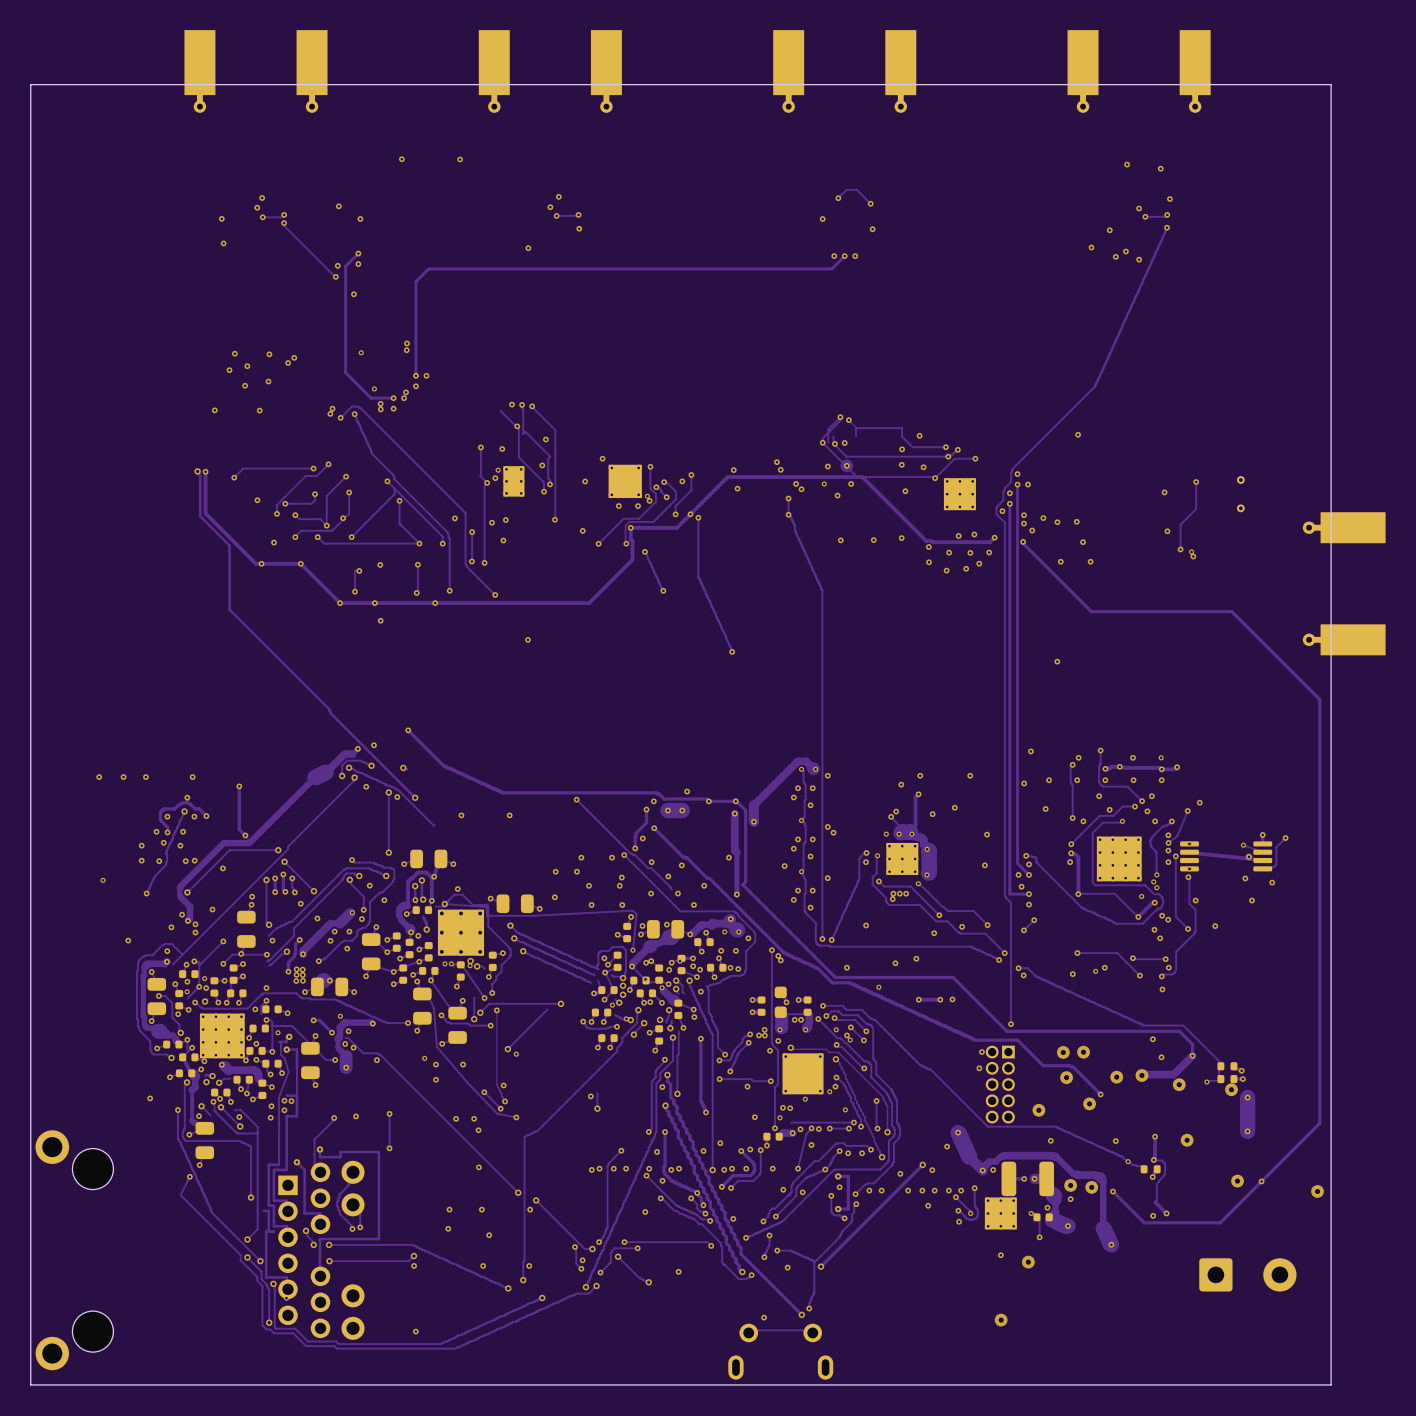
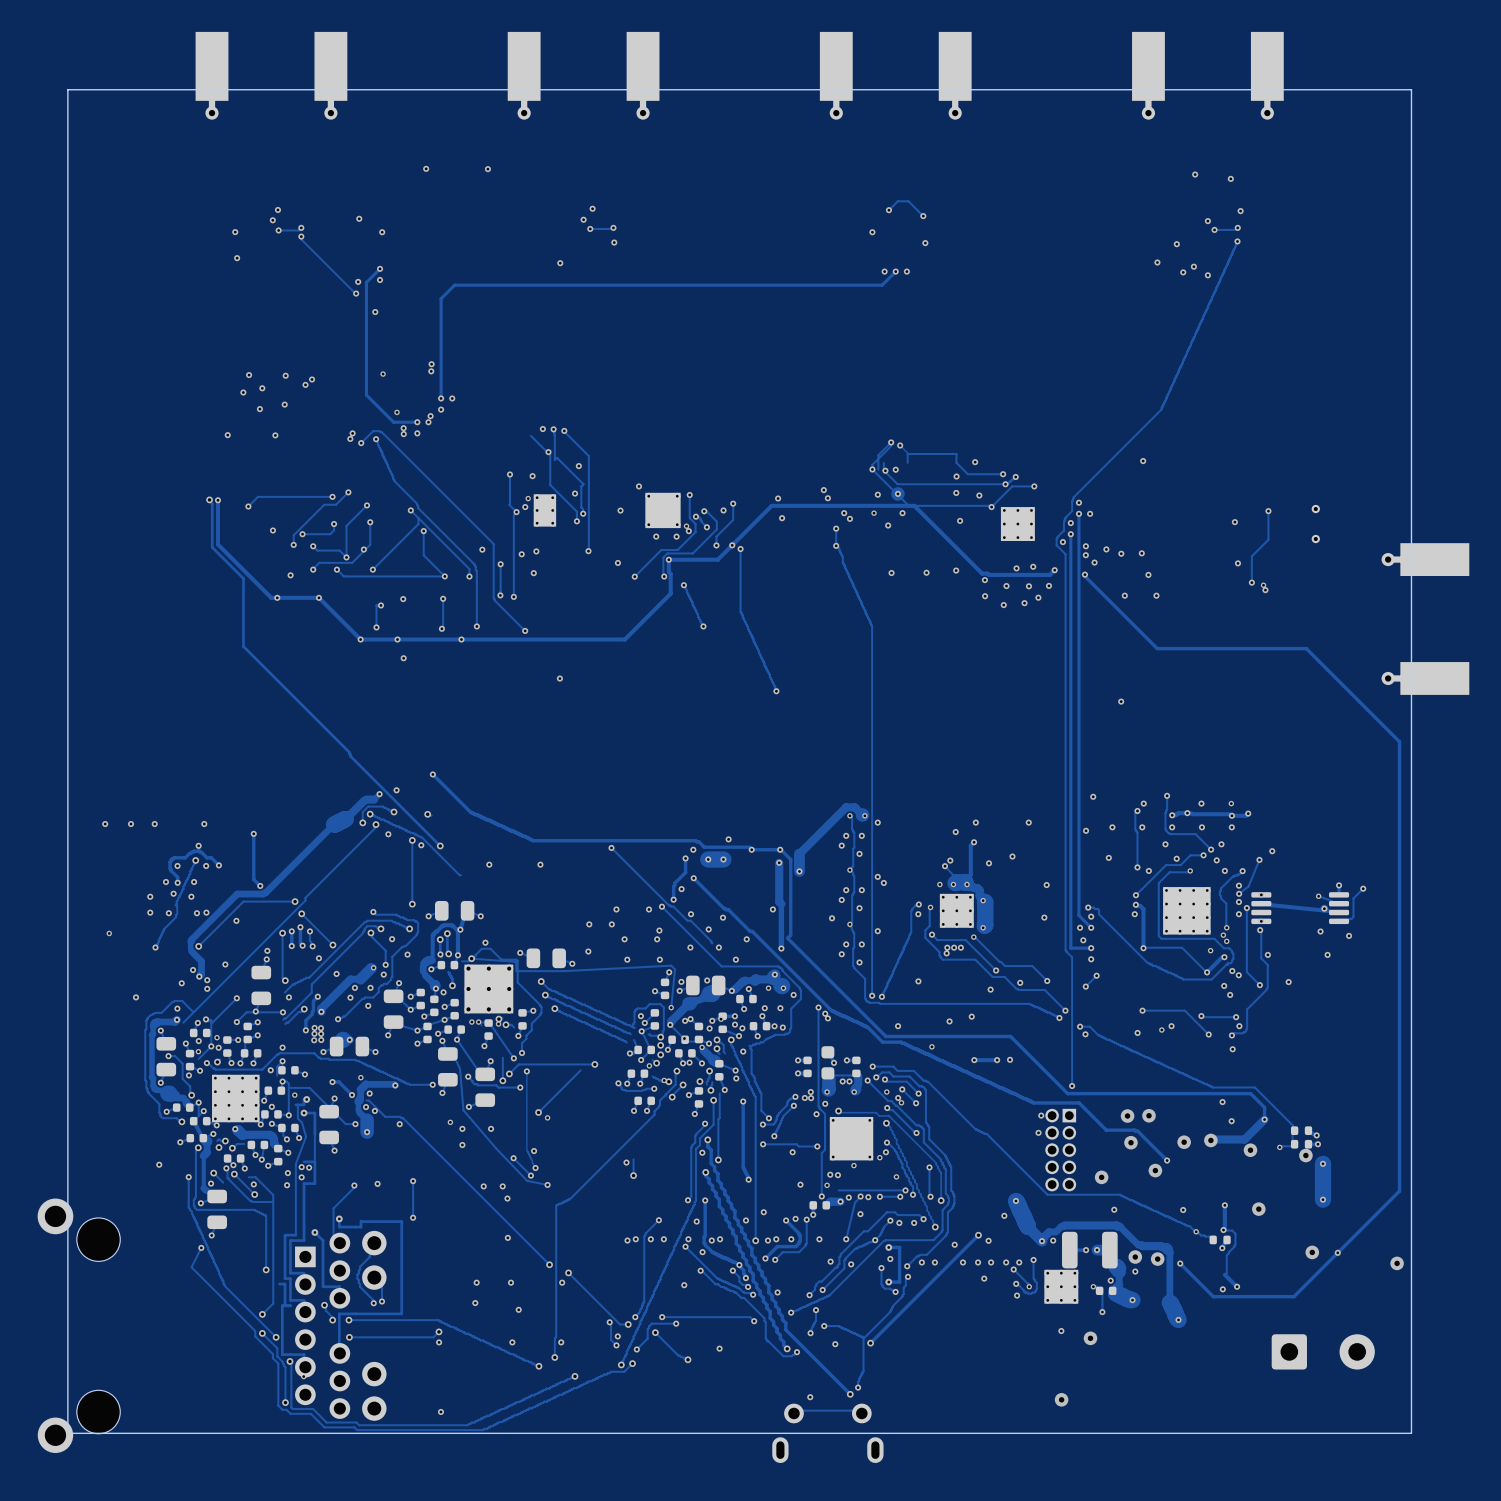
board edge: (64, 84) (30, 84) (30, 1384) (1331, 1384) (1331, 1351) -> (67, 89) (67, 1433) (1411, 1433)

